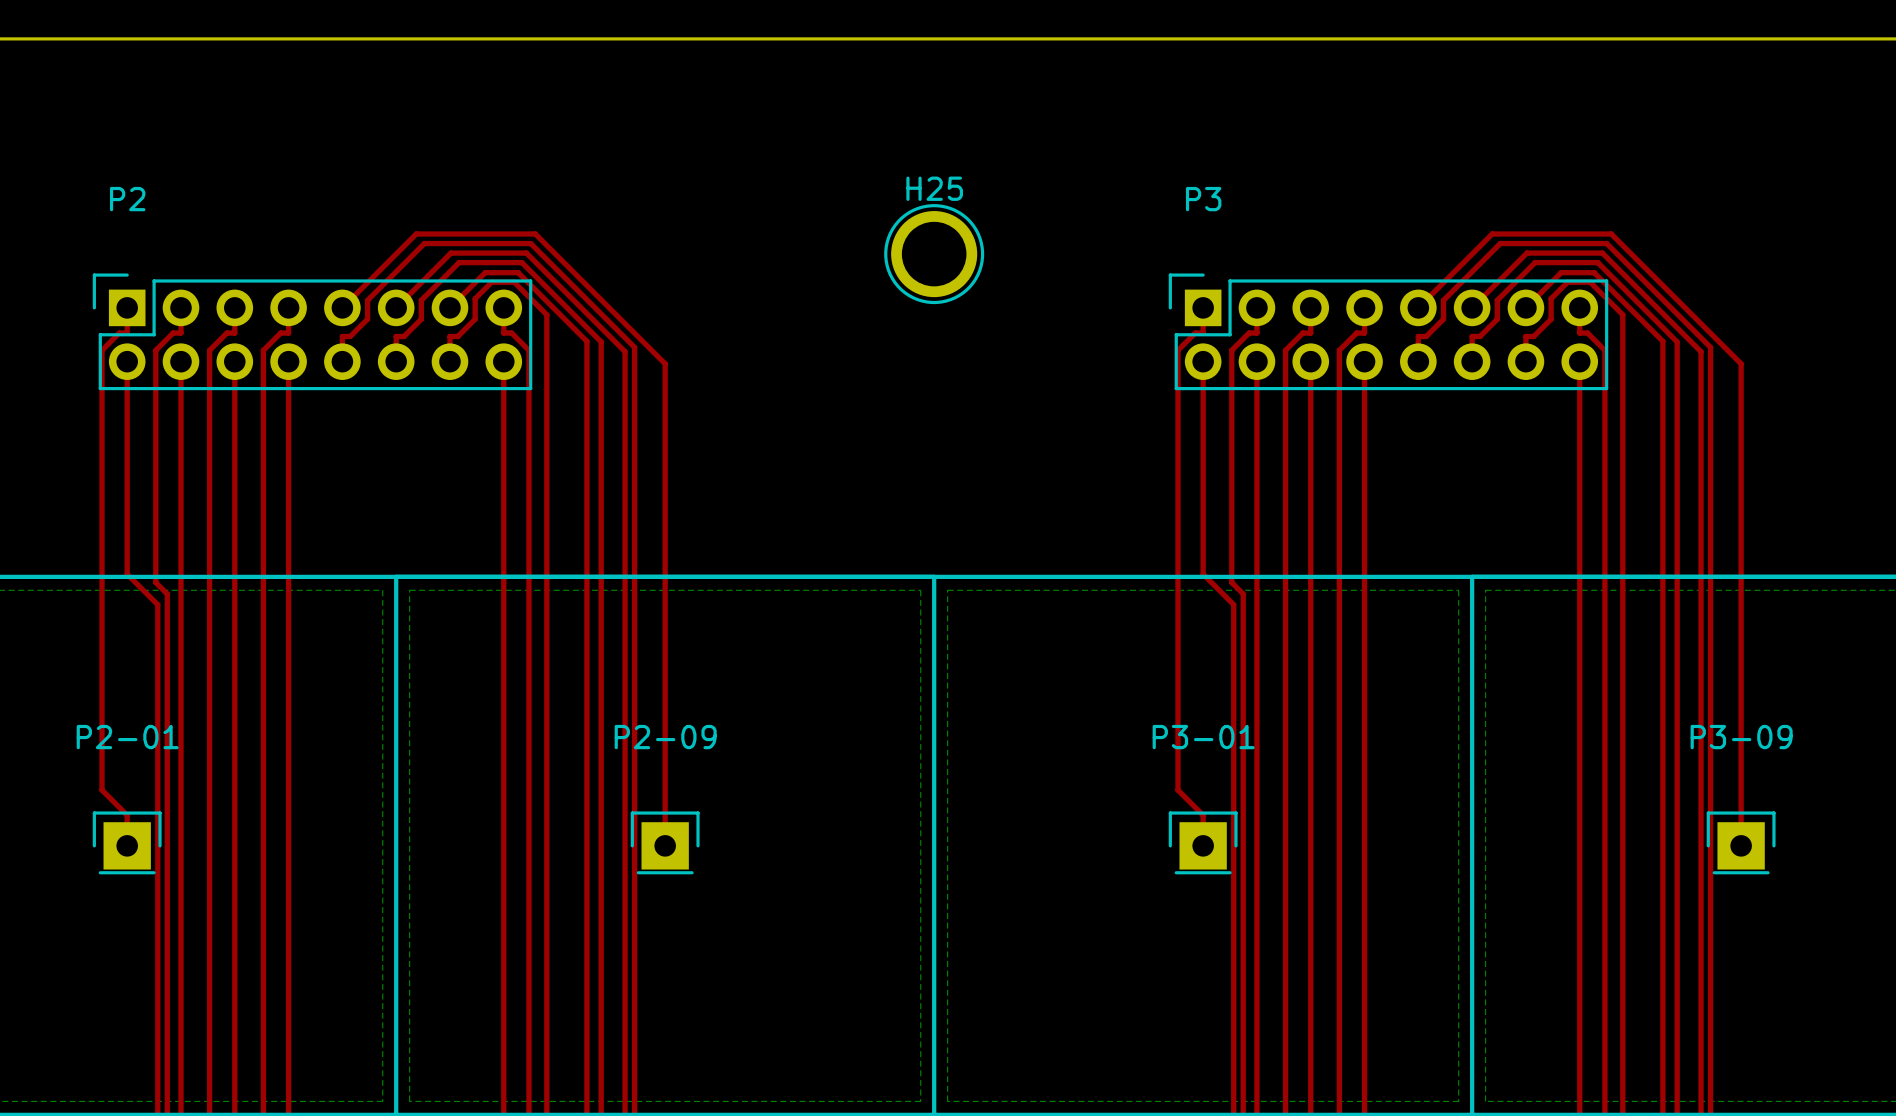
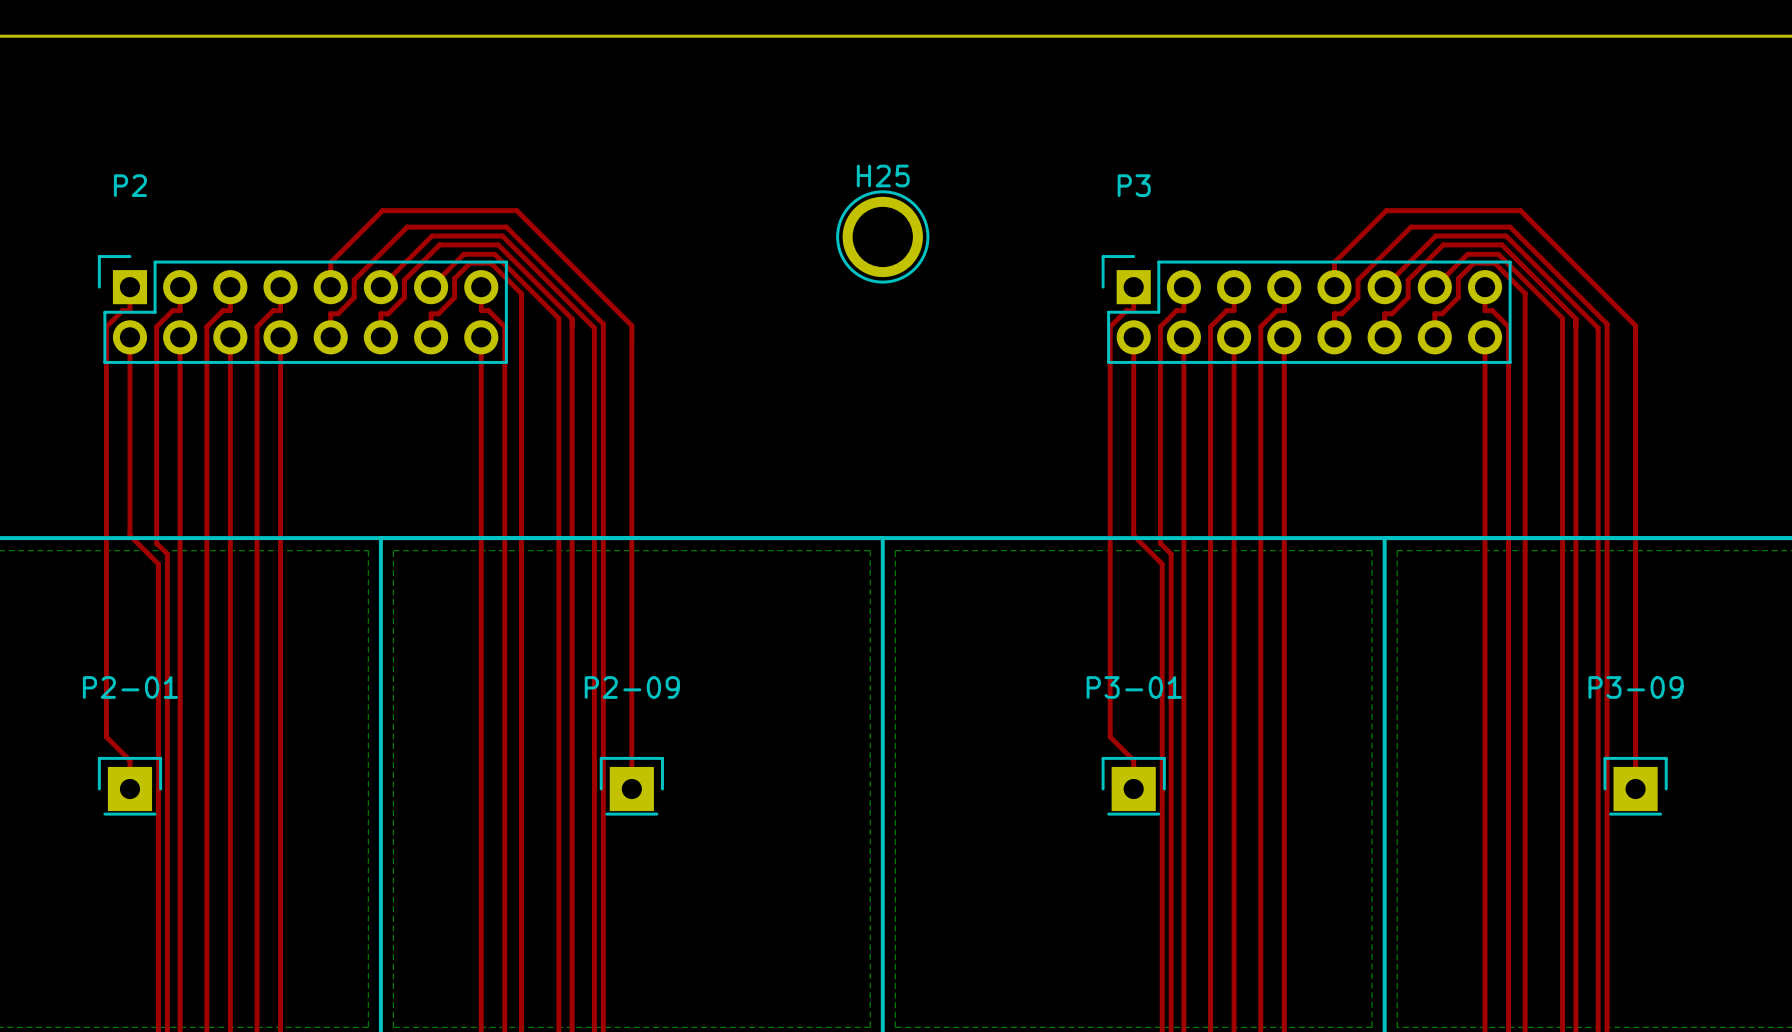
top track: (342, 307) (416, 233) (535, 233) (665, 363) -> (330, 287) (330, 262) (382, 210) (516, 210) (631, 325) (631, 339)
top track: (1418, 307) (1492, 233) (1611, 233) (1741, 363) -> (1334, 287) (1334, 262) (1386, 210) (1520, 210) (1635, 325) (1635, 339)

